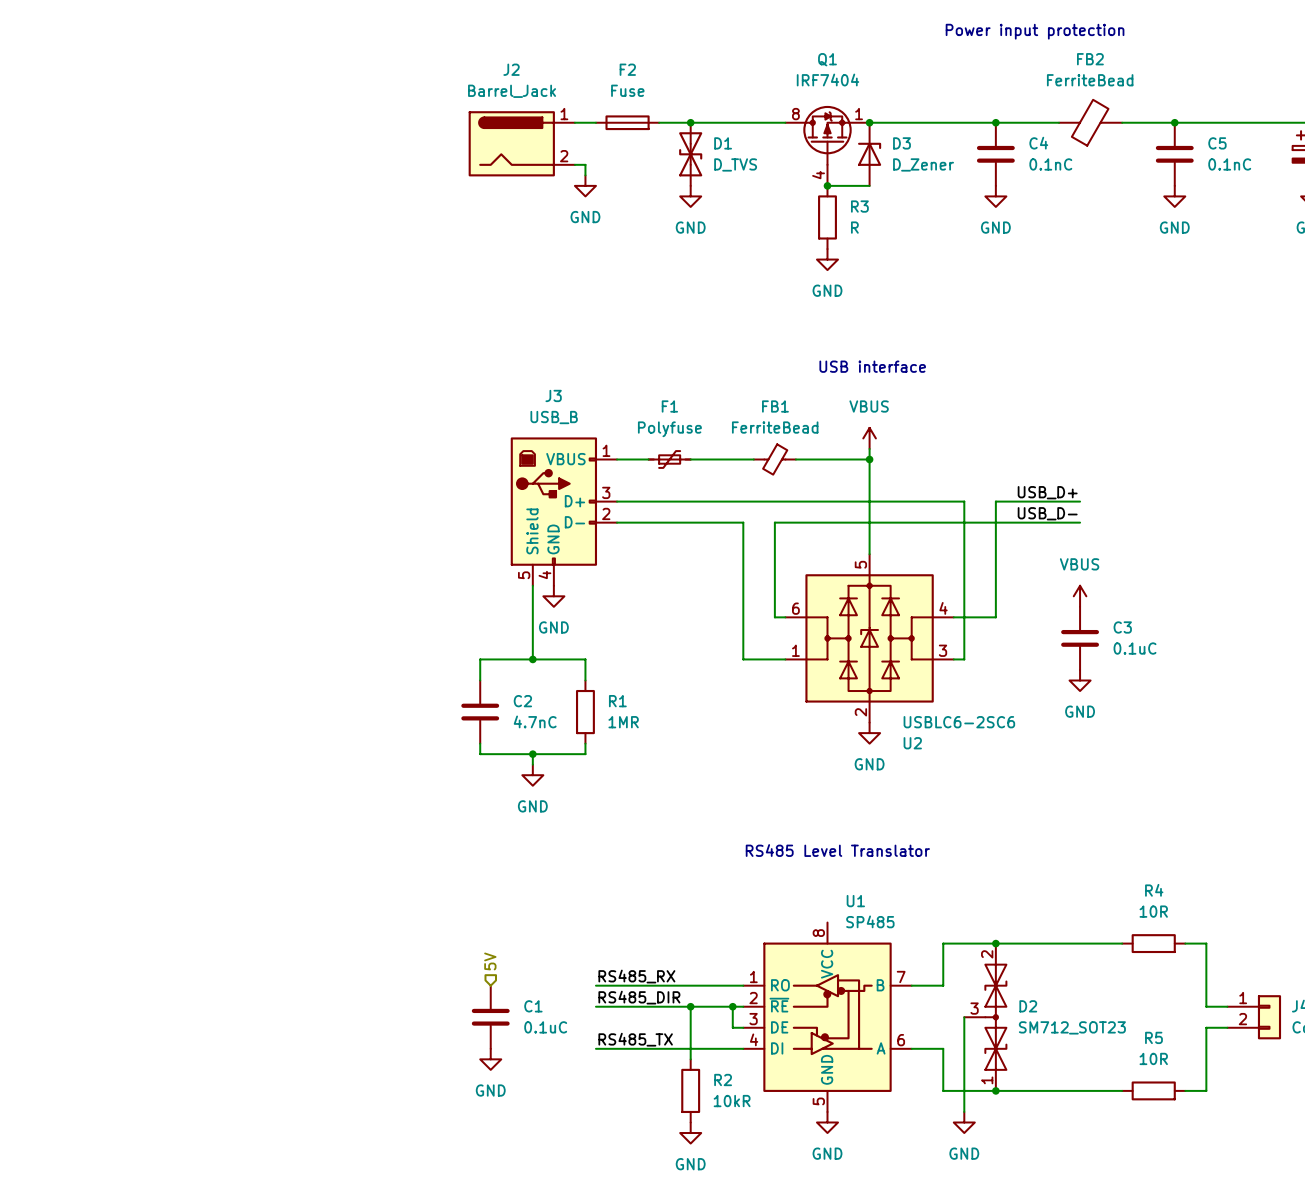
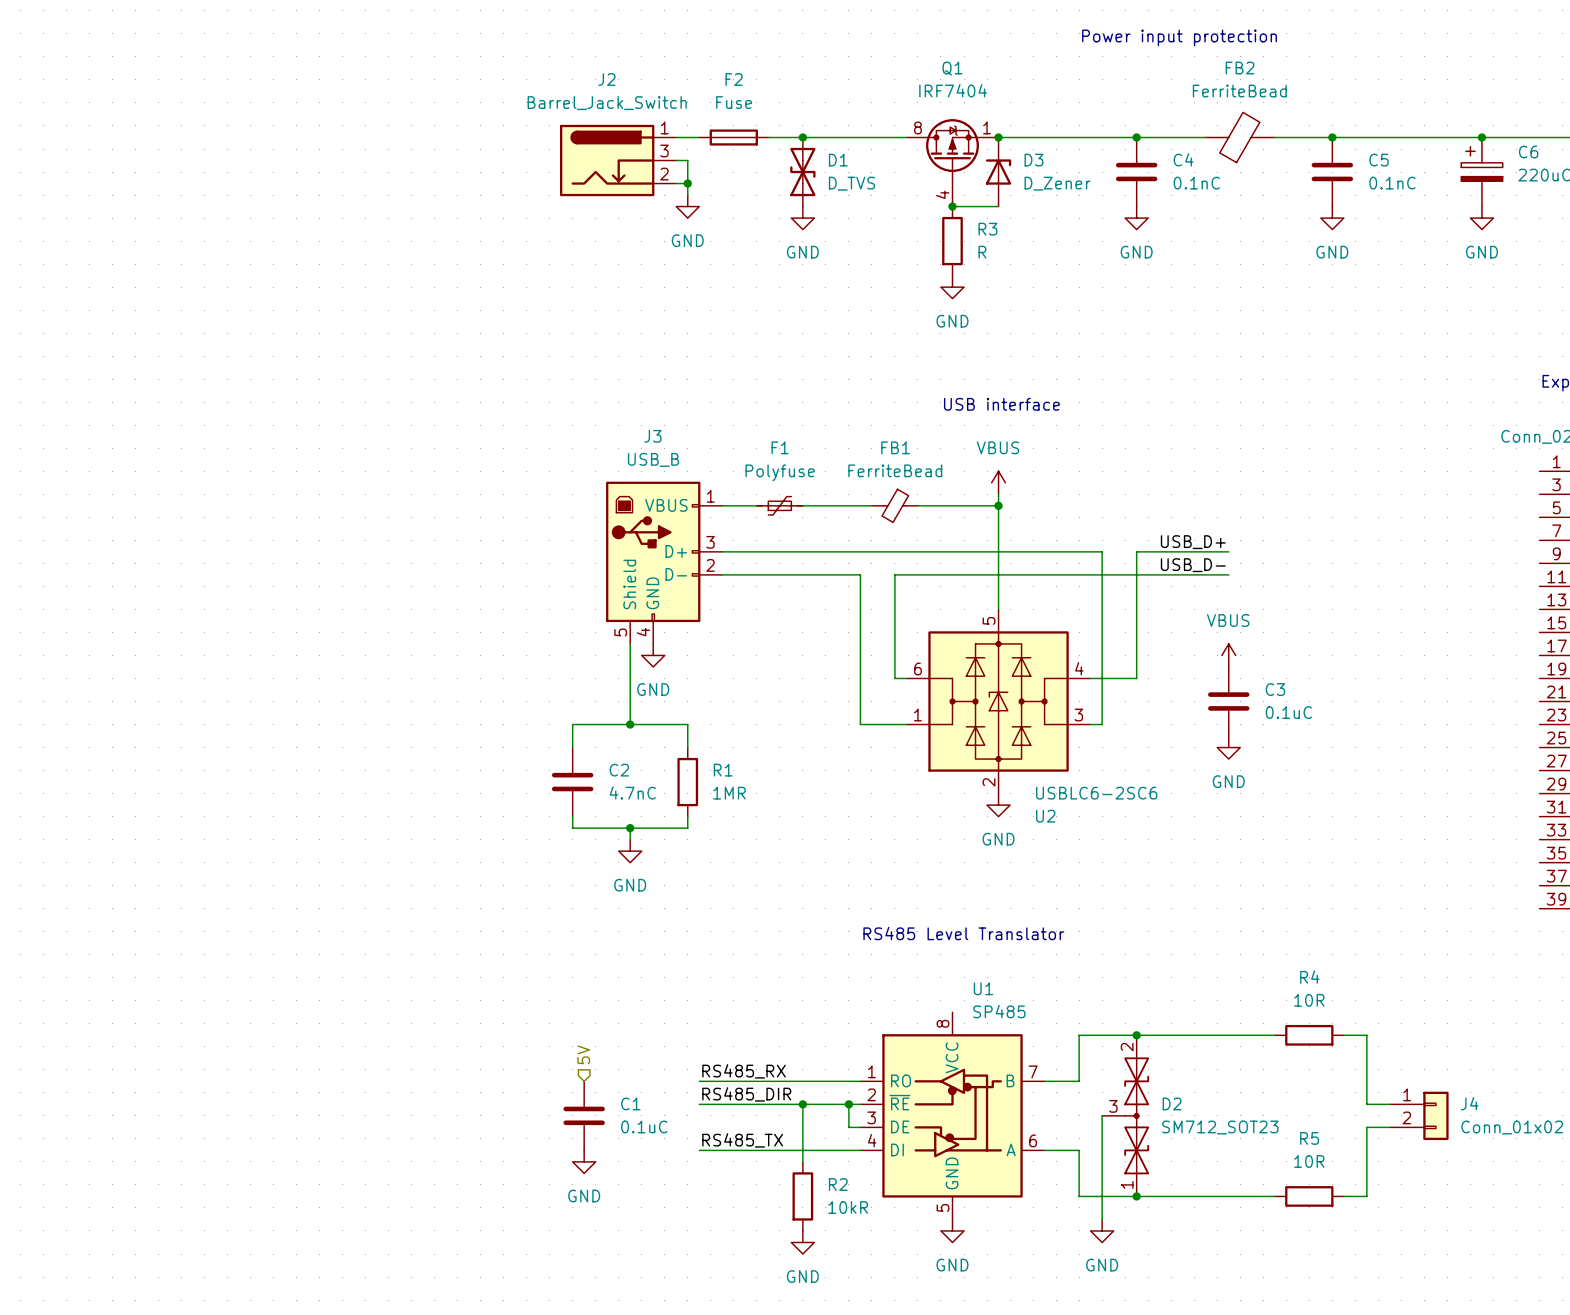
J2 value: Barrel_Jack (512, 91) -> Barrel_Jack_Switch (607, 103)
J2 symbol: [468, 111, 575, 177] -> [560, 124, 677, 197]
wire: none -> (676, 160) (687, 160) (687, 183)
junction: none -> (687, 183)

